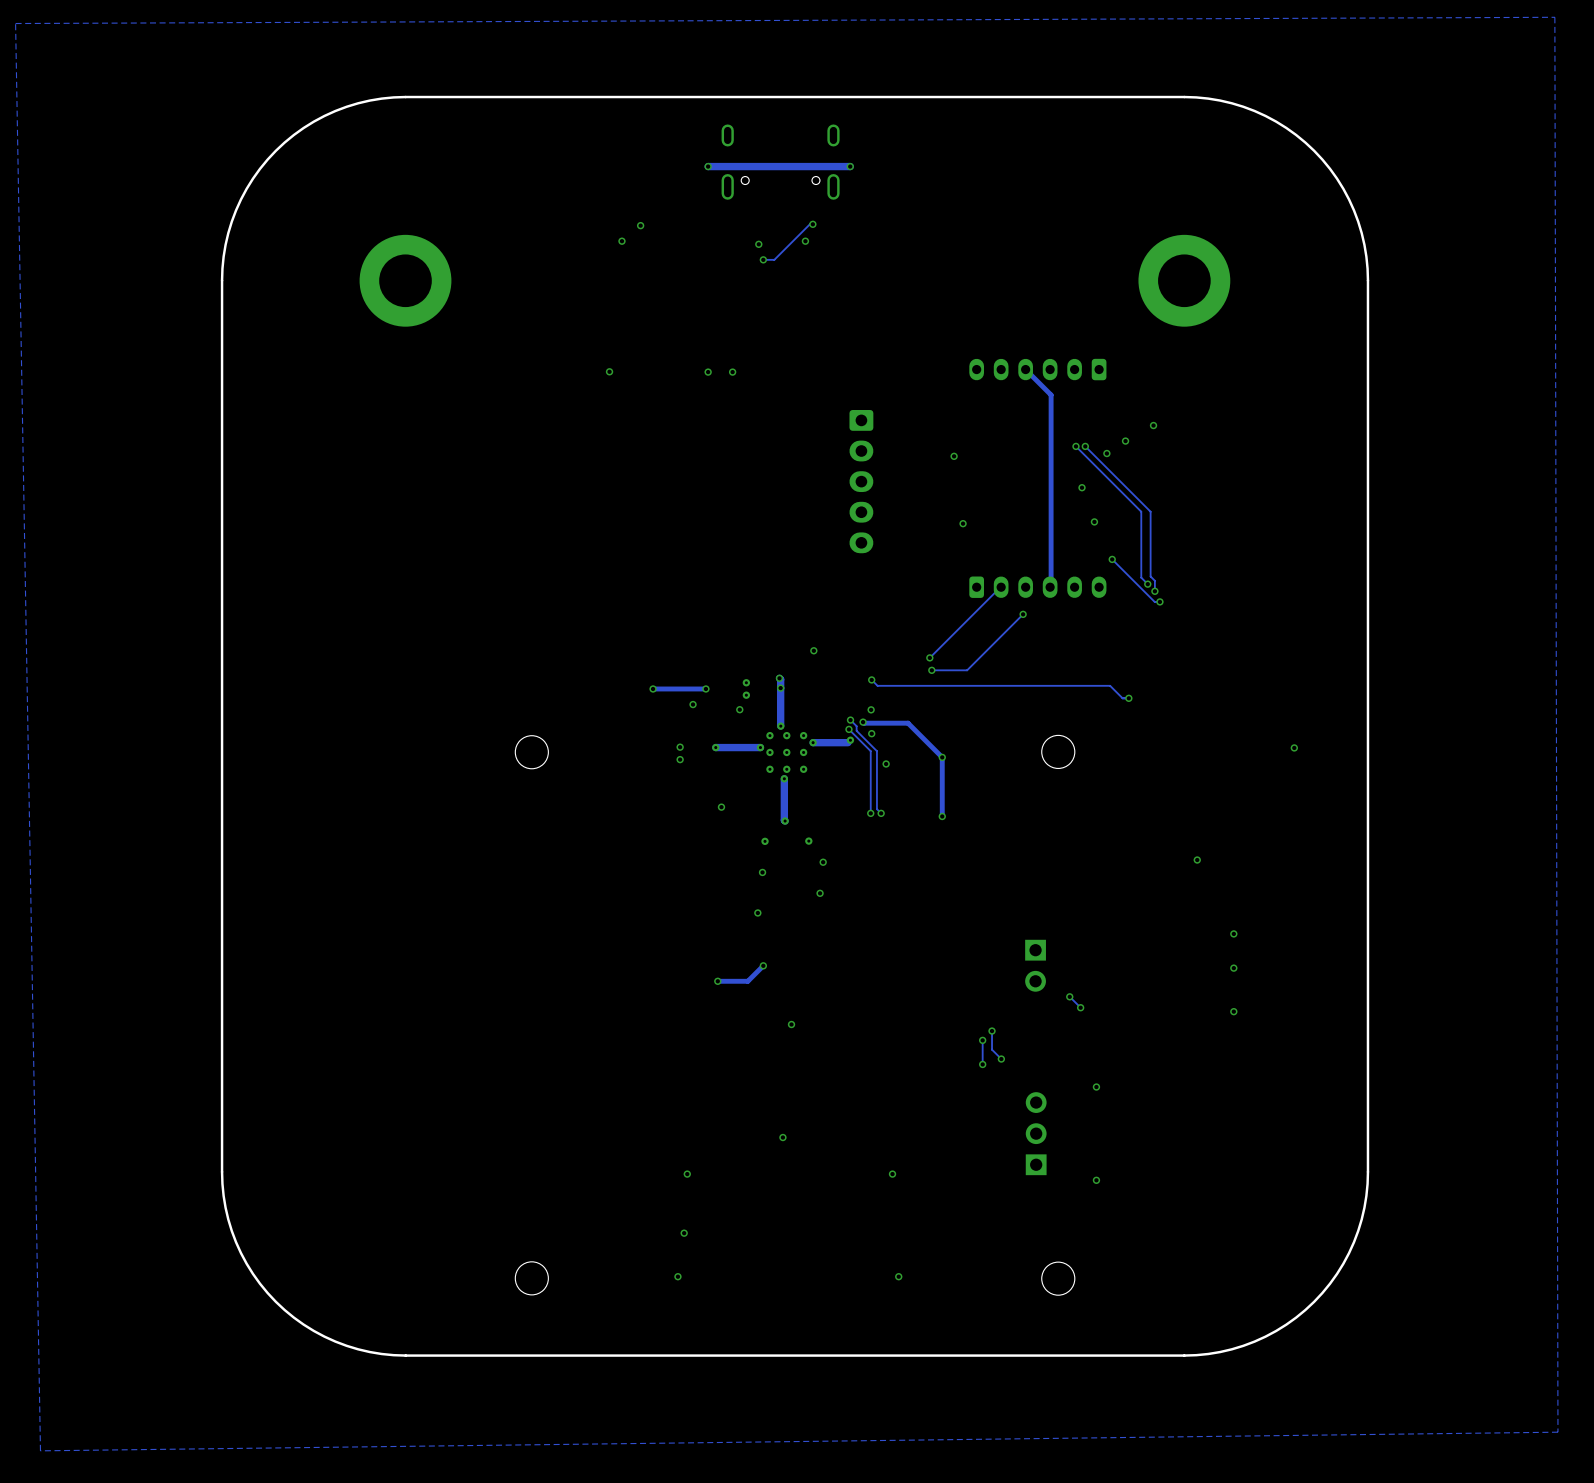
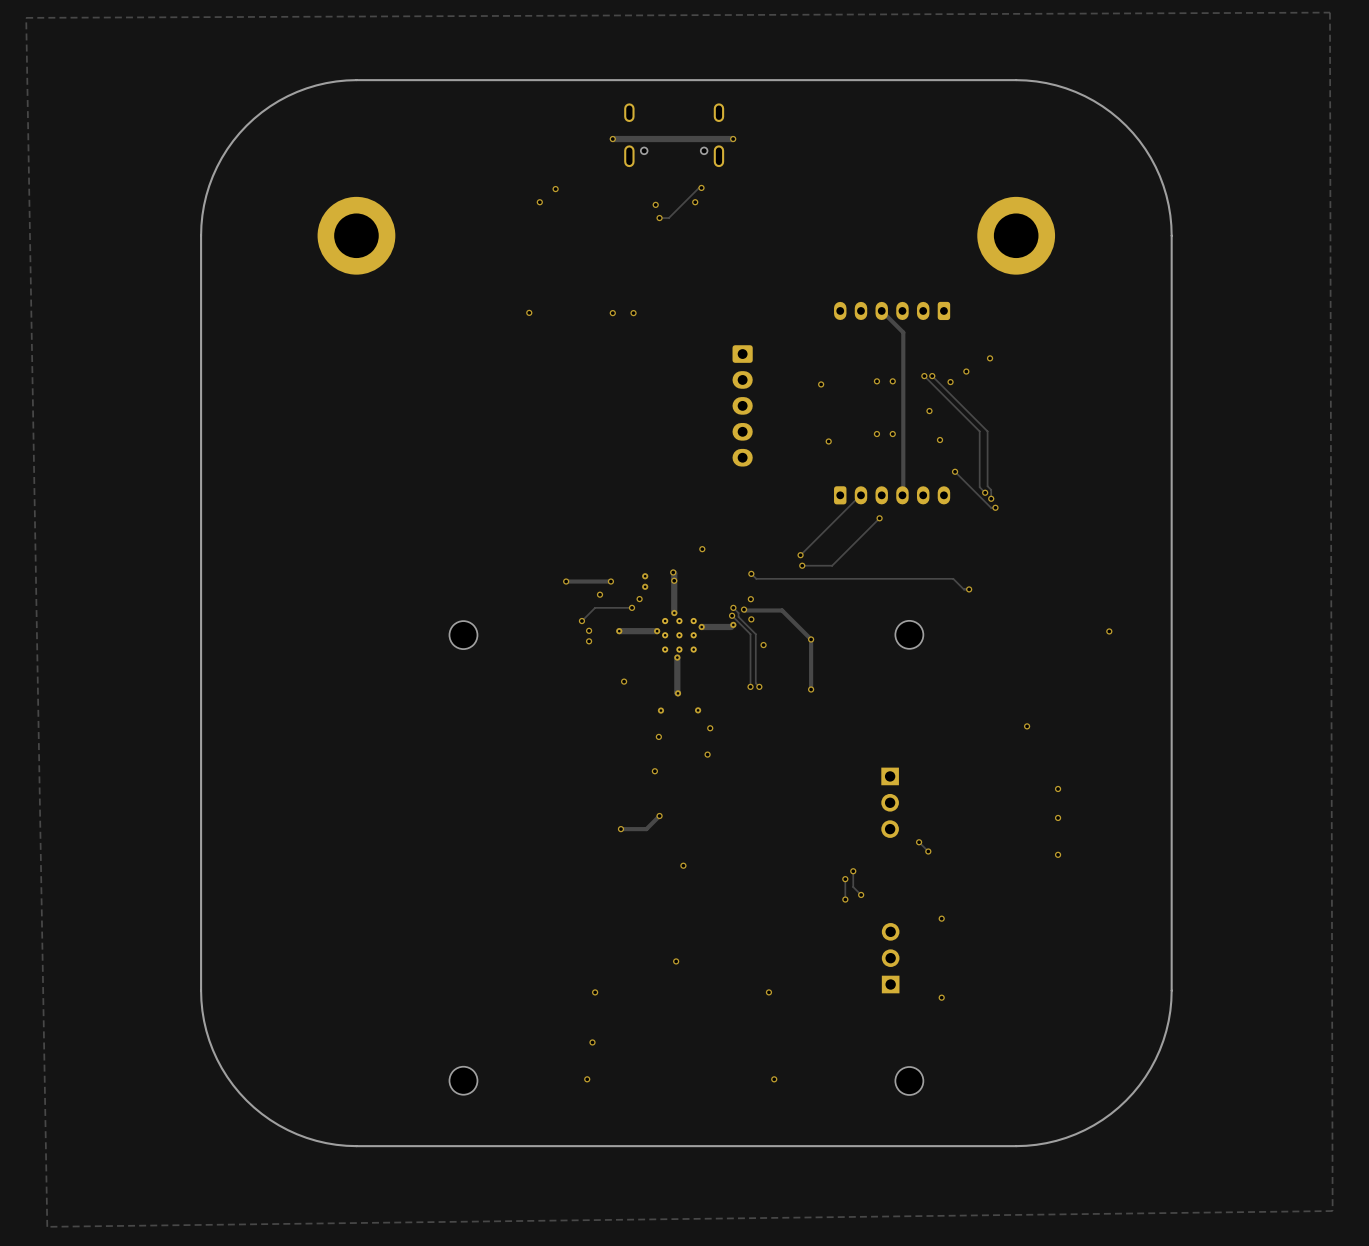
via: none -> (876, 381)
via: none -> (892, 381)
via: none -> (876, 434)
via: none -> (892, 434)
track: none -> (632, 607) (595, 607) (581, 621)
via: none -> (632, 607)
via: none -> (581, 621)
part: none -> (890, 802)
part: (1035, 965) -> none

